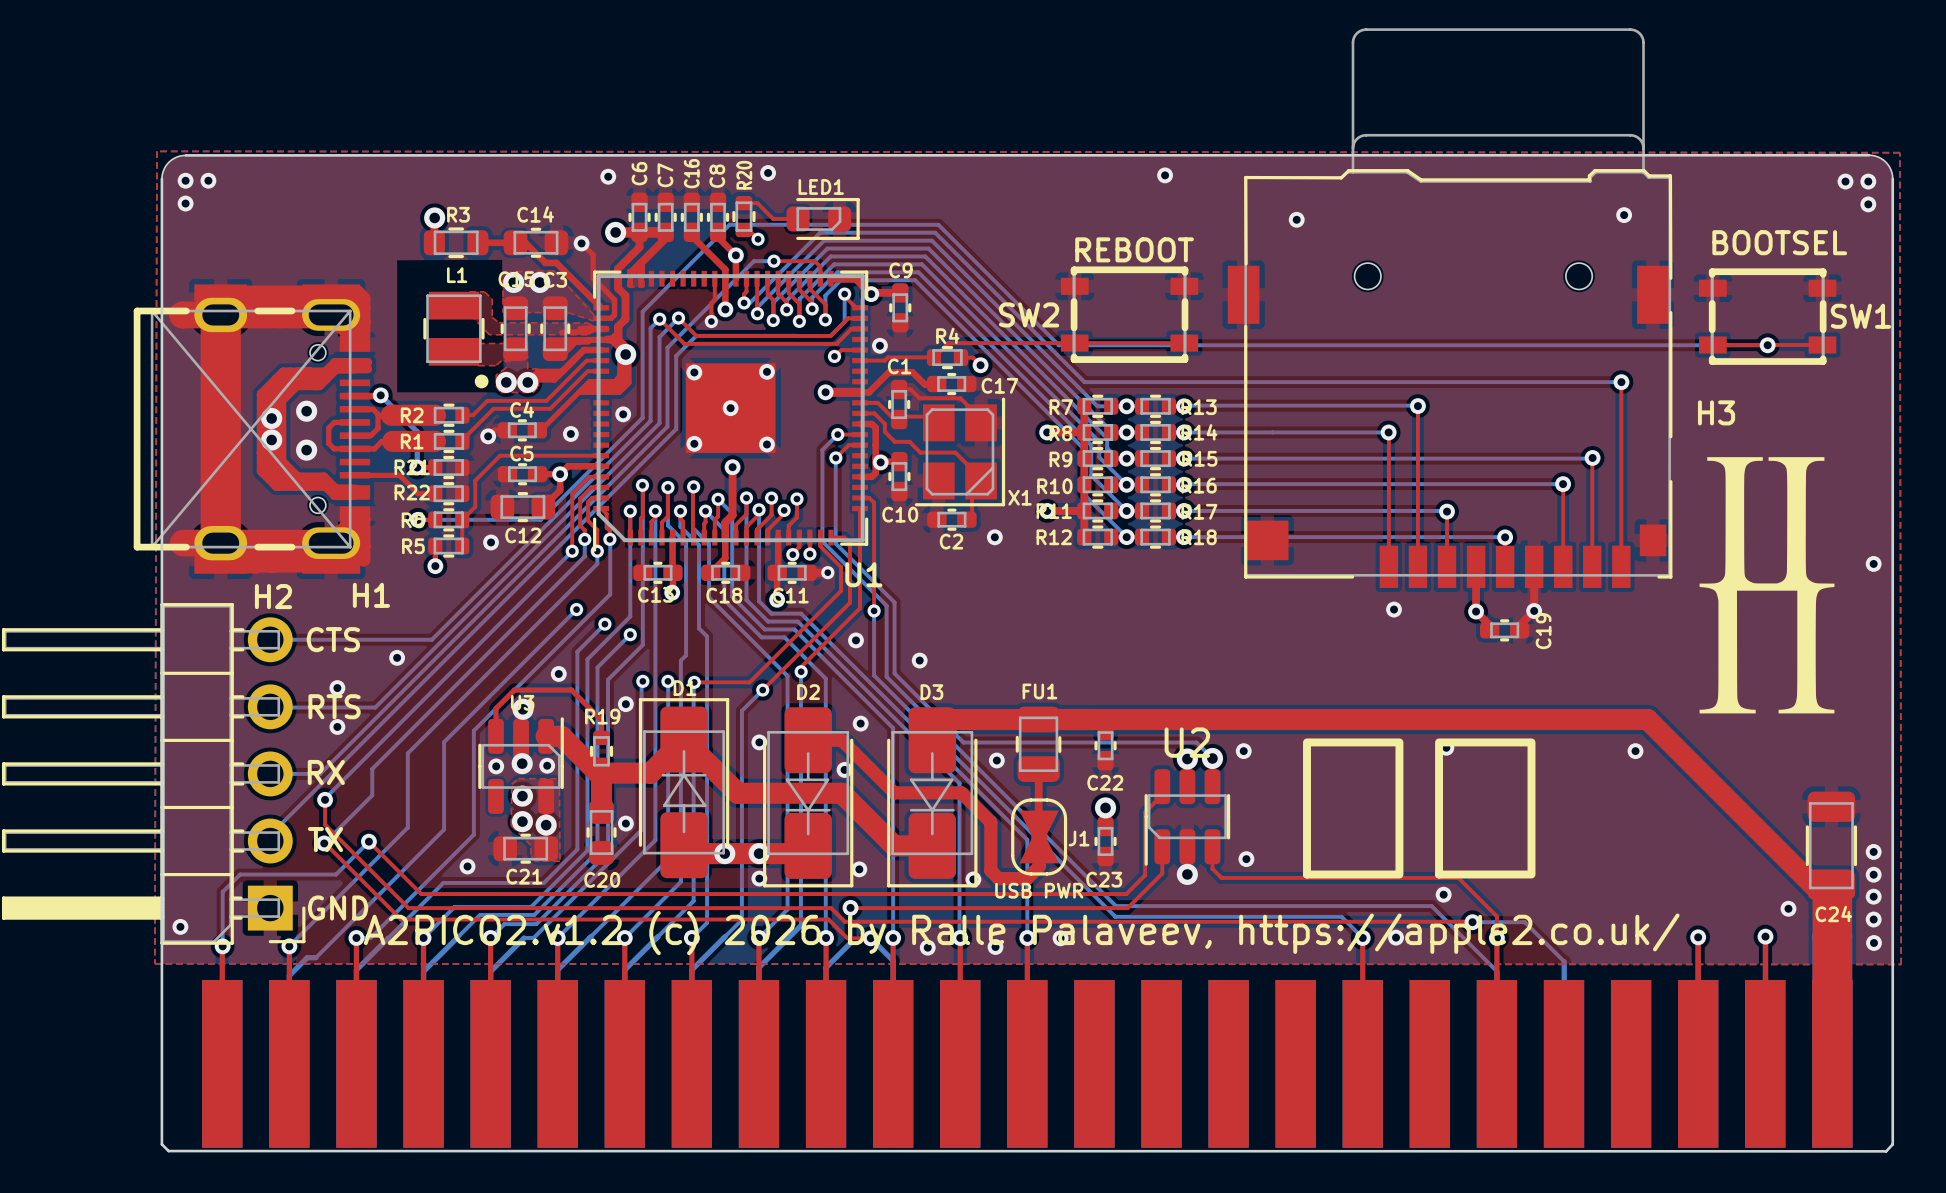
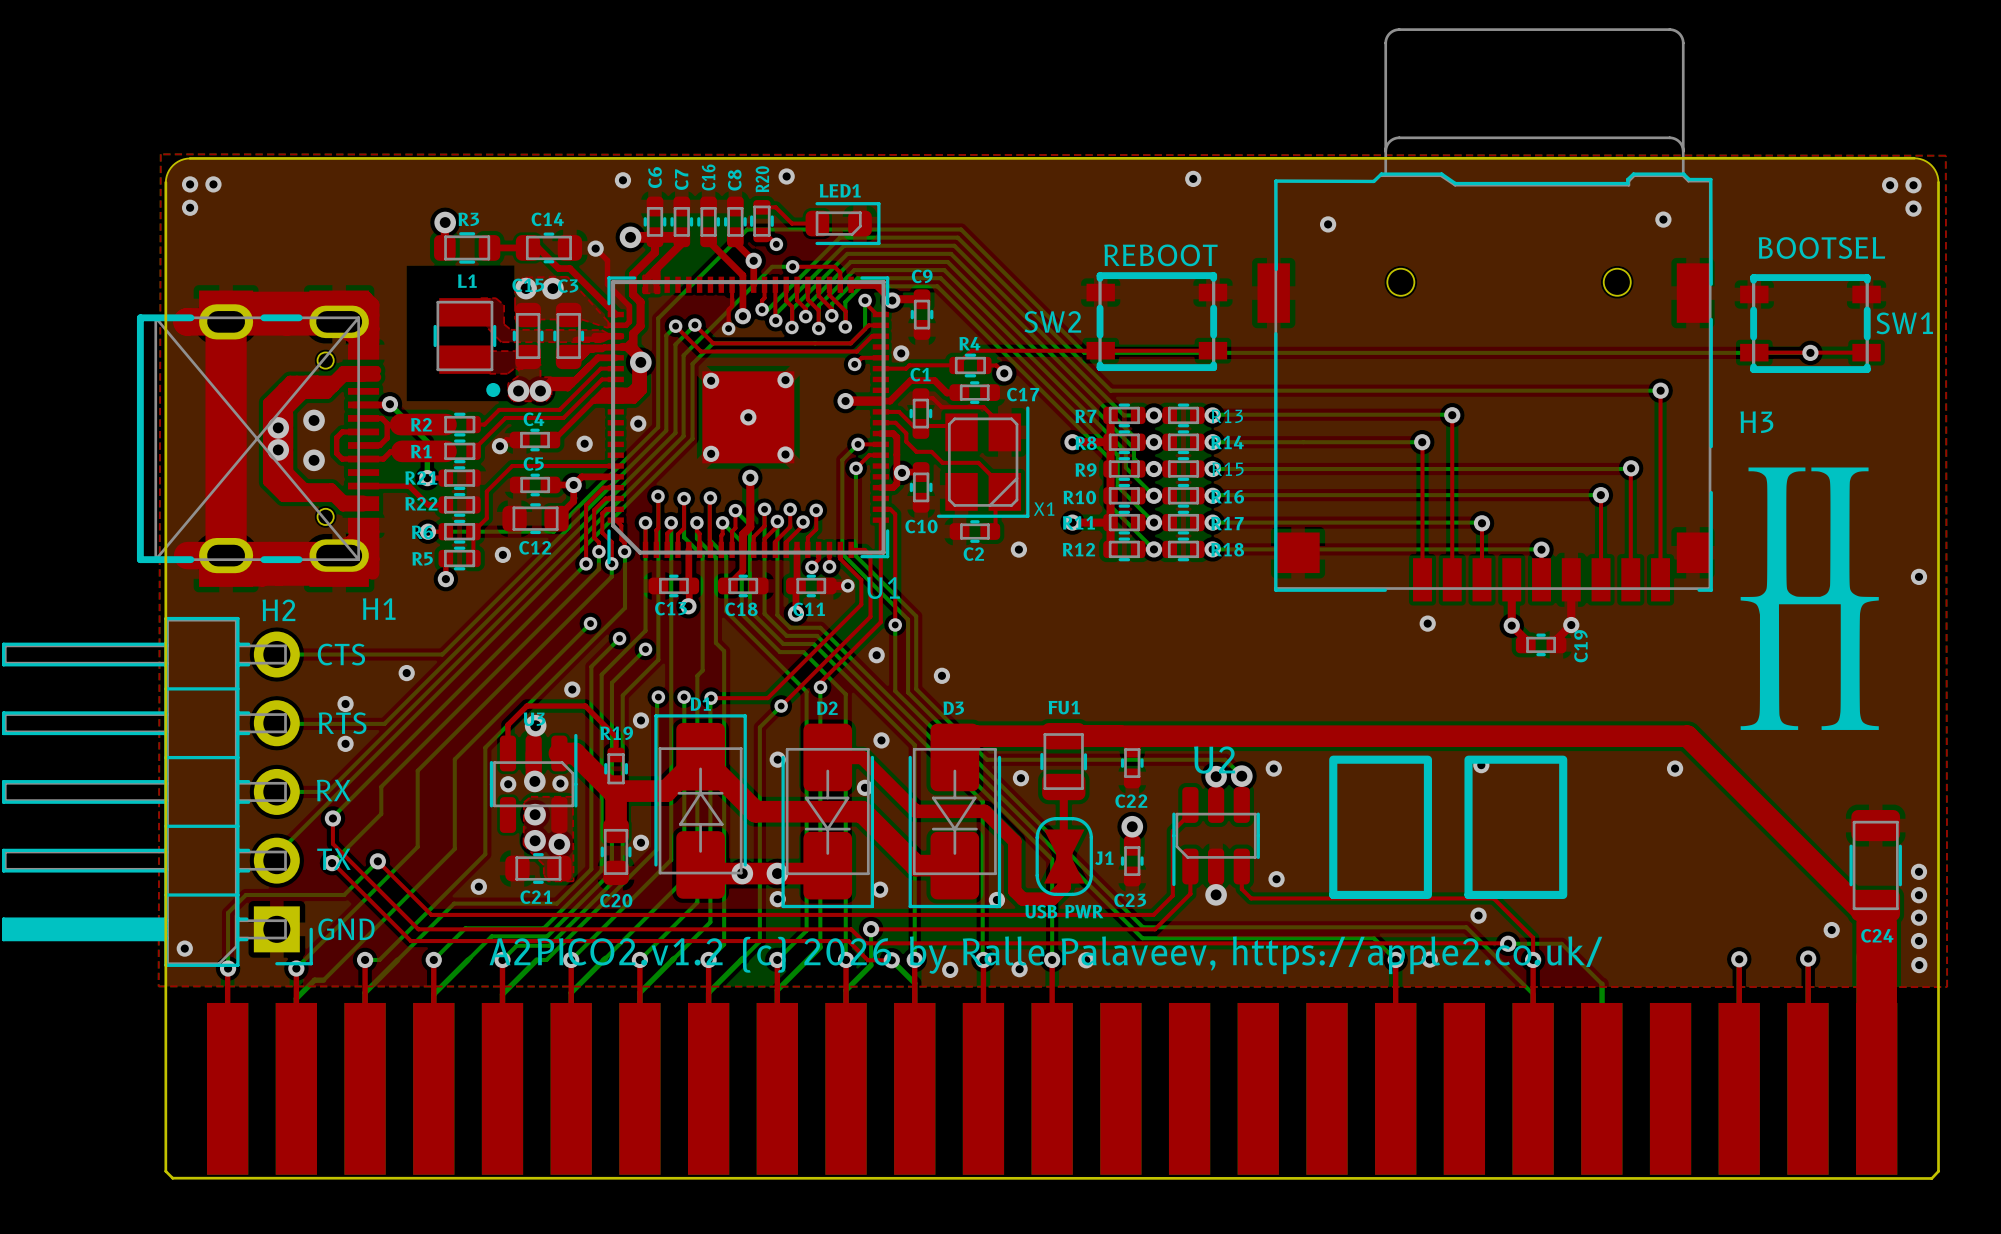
H3 footprint: [1227, 28, 1673, 588] -> [1257, 28, 1713, 602]

